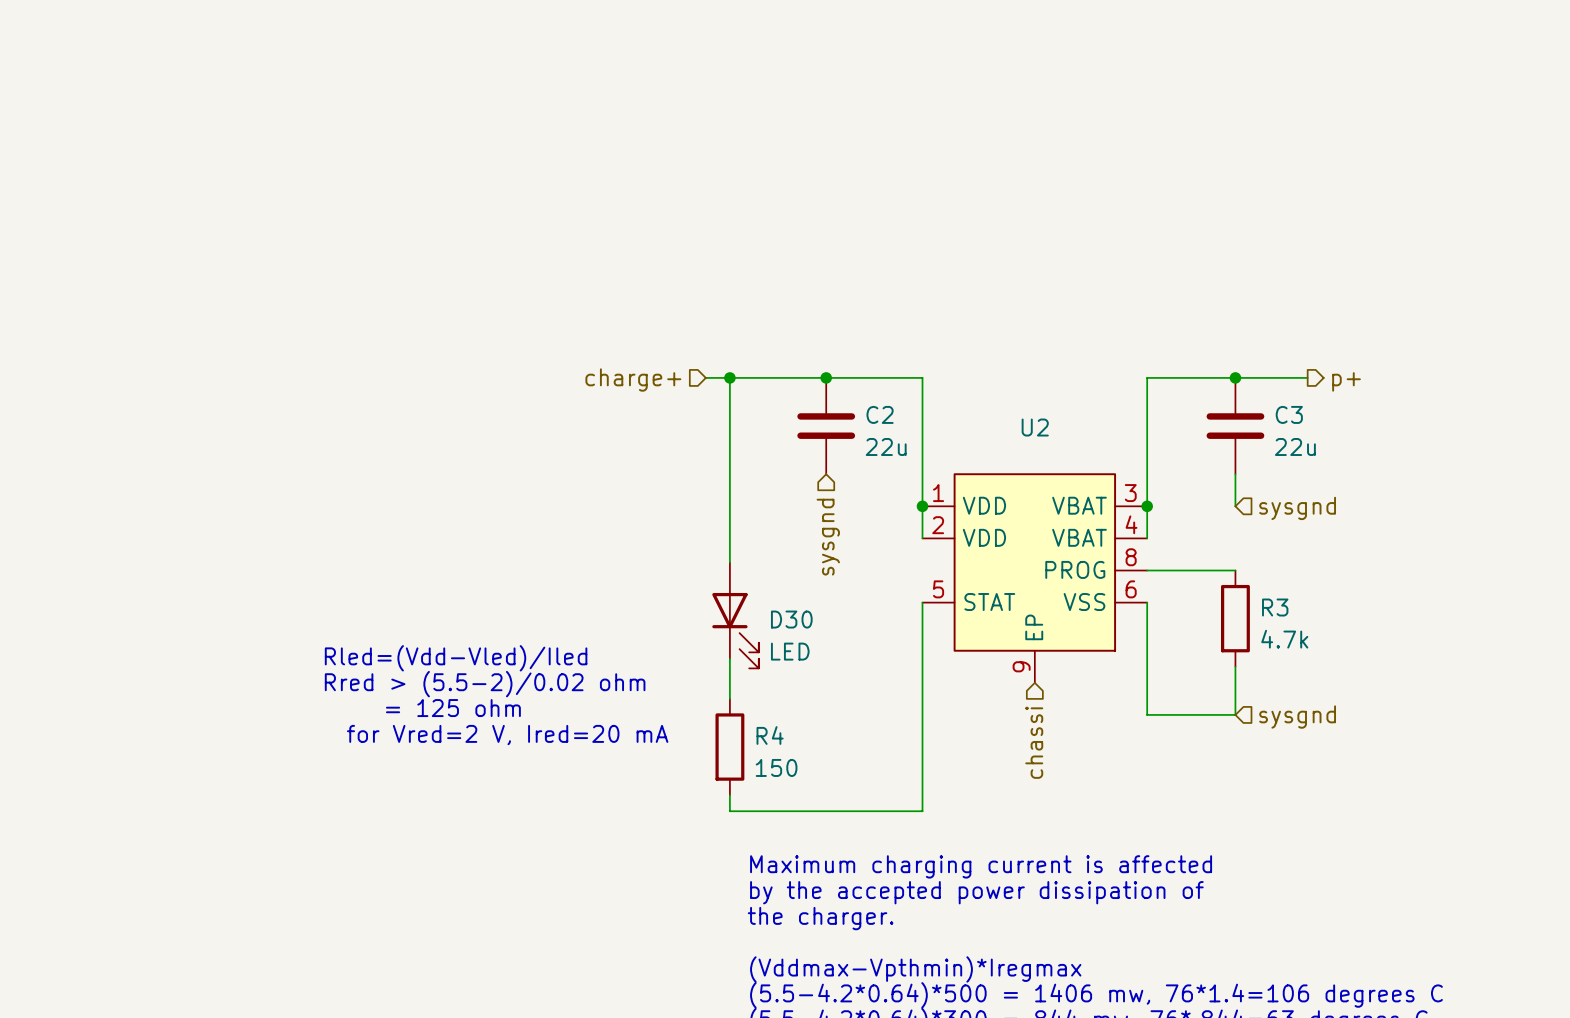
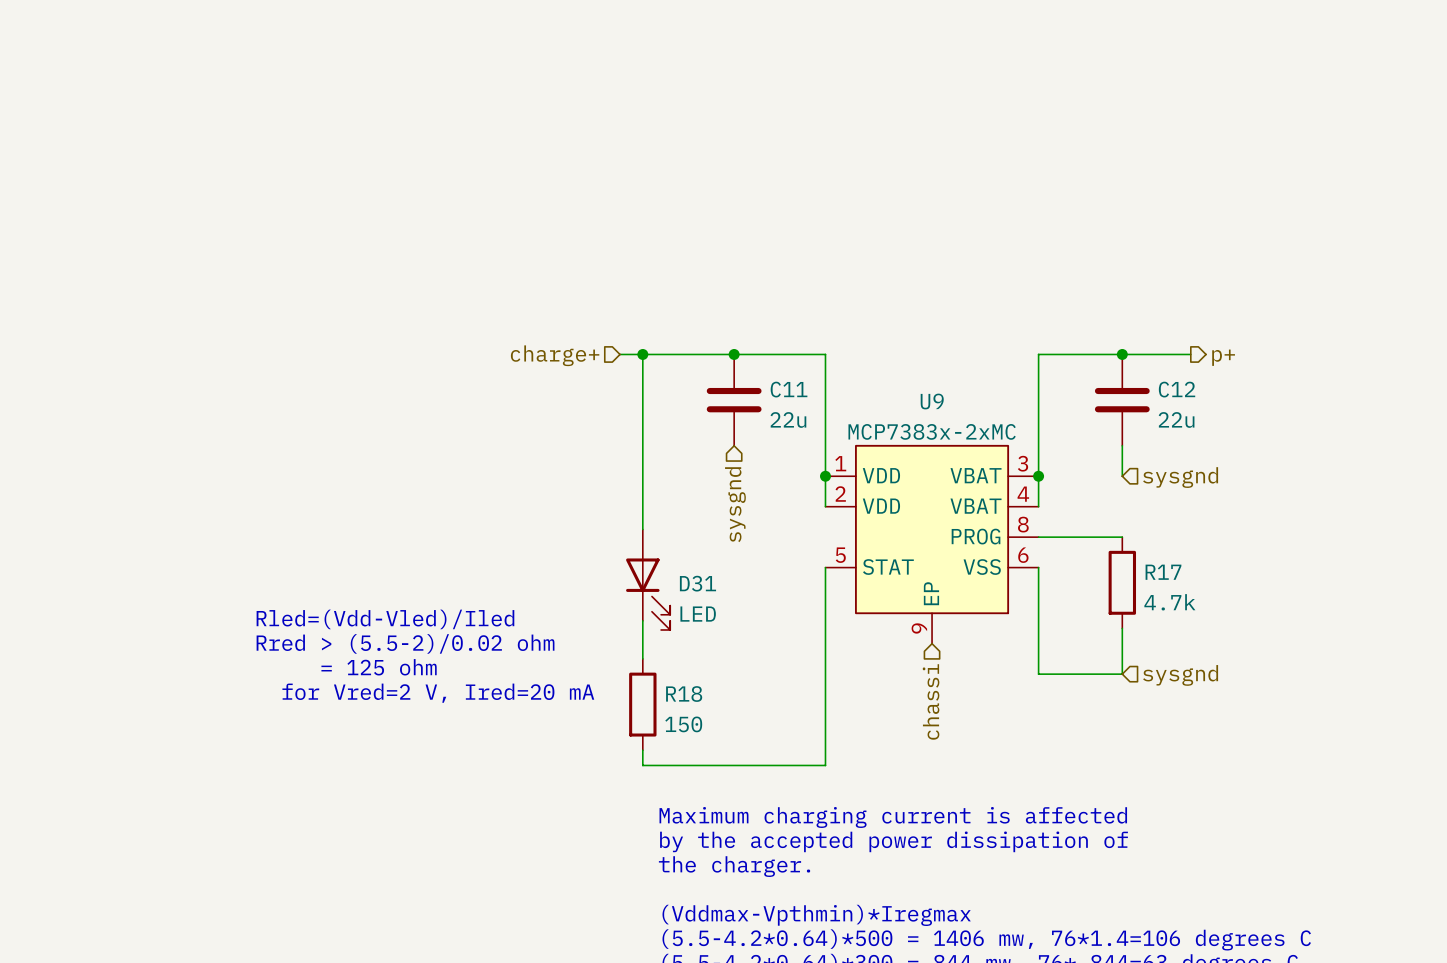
C2 name: C2 (880, 414) -> C11 (789, 389)
C3 name: C3 (1289, 414) -> C12 (1177, 389)
U2 name: U2 (1035, 427) -> U9 (932, 401)
U2 value: none -> MCP7383x-2xMC (932, 431)
R3 name: R3 (1275, 607) -> R17 (1163, 572)
D30 name: D30 (791, 619) -> D31 (697, 583)
R4 name: R4 (770, 735) -> R18 (684, 694)

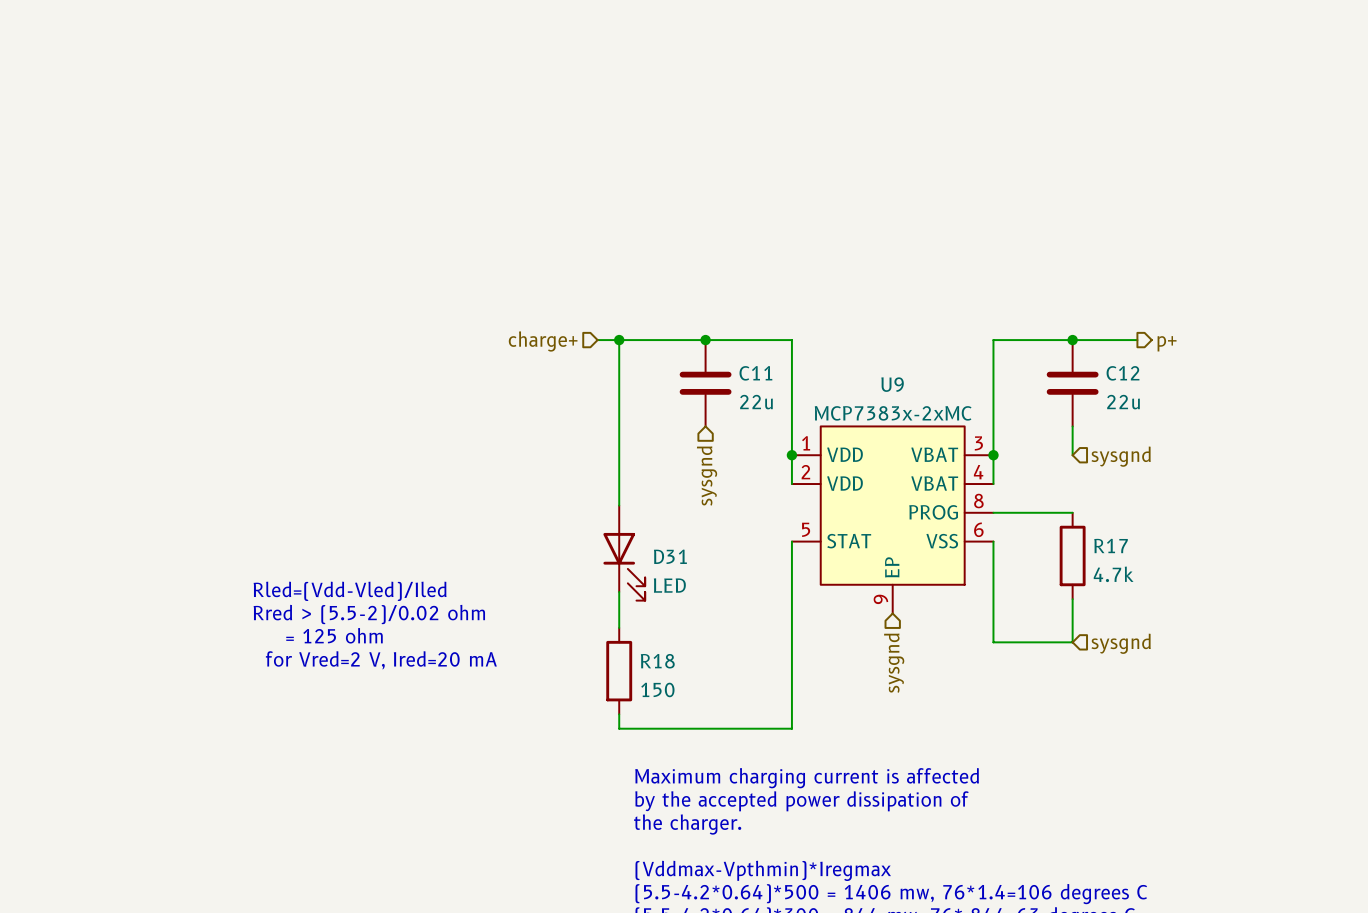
hierarchical label: chassi (931, 701) -> sysgnd (894, 663)

